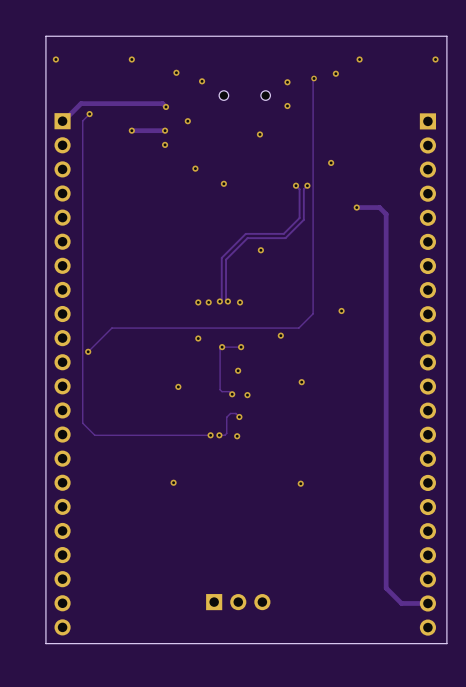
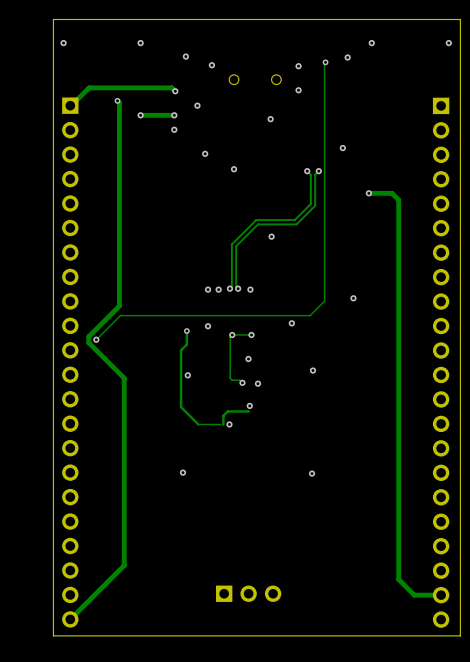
track: (89, 114) (82, 120) (82, 423) (94, 435) (188, 435) -> (186, 331) (186, 344) (181, 350) (181, 407) (198, 424)
via: (89, 114) -> none
track: none -> (117, 100) (119, 102) (119, 306) (88, 336) (88, 342) (124, 378) (124, 565) (70, 619)
via: none -> (117, 100)
via: none -> (186, 331)
track: (239, 417) (235, 413) (230, 413) (226, 417) (226, 433) (219, 435) -> none
track: none -> (248, 411) (227, 411) (223, 415) (223, 424)
via: (210, 435) -> none
via: (237, 436) -> none

